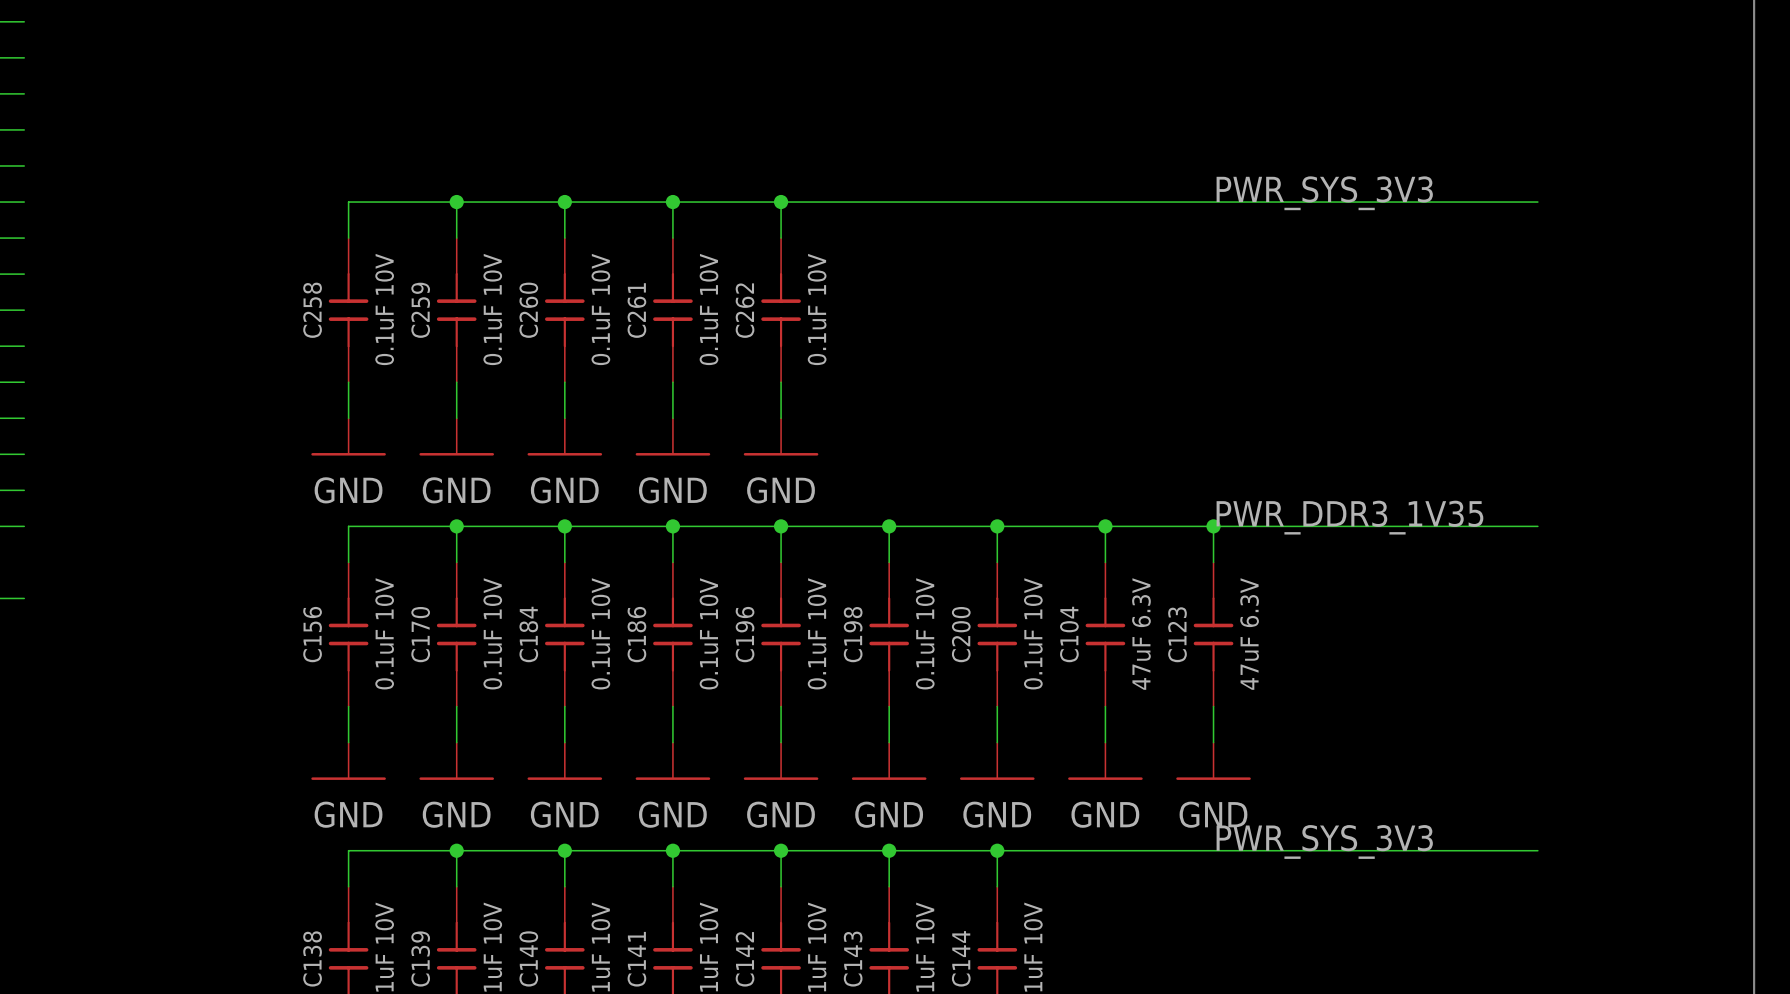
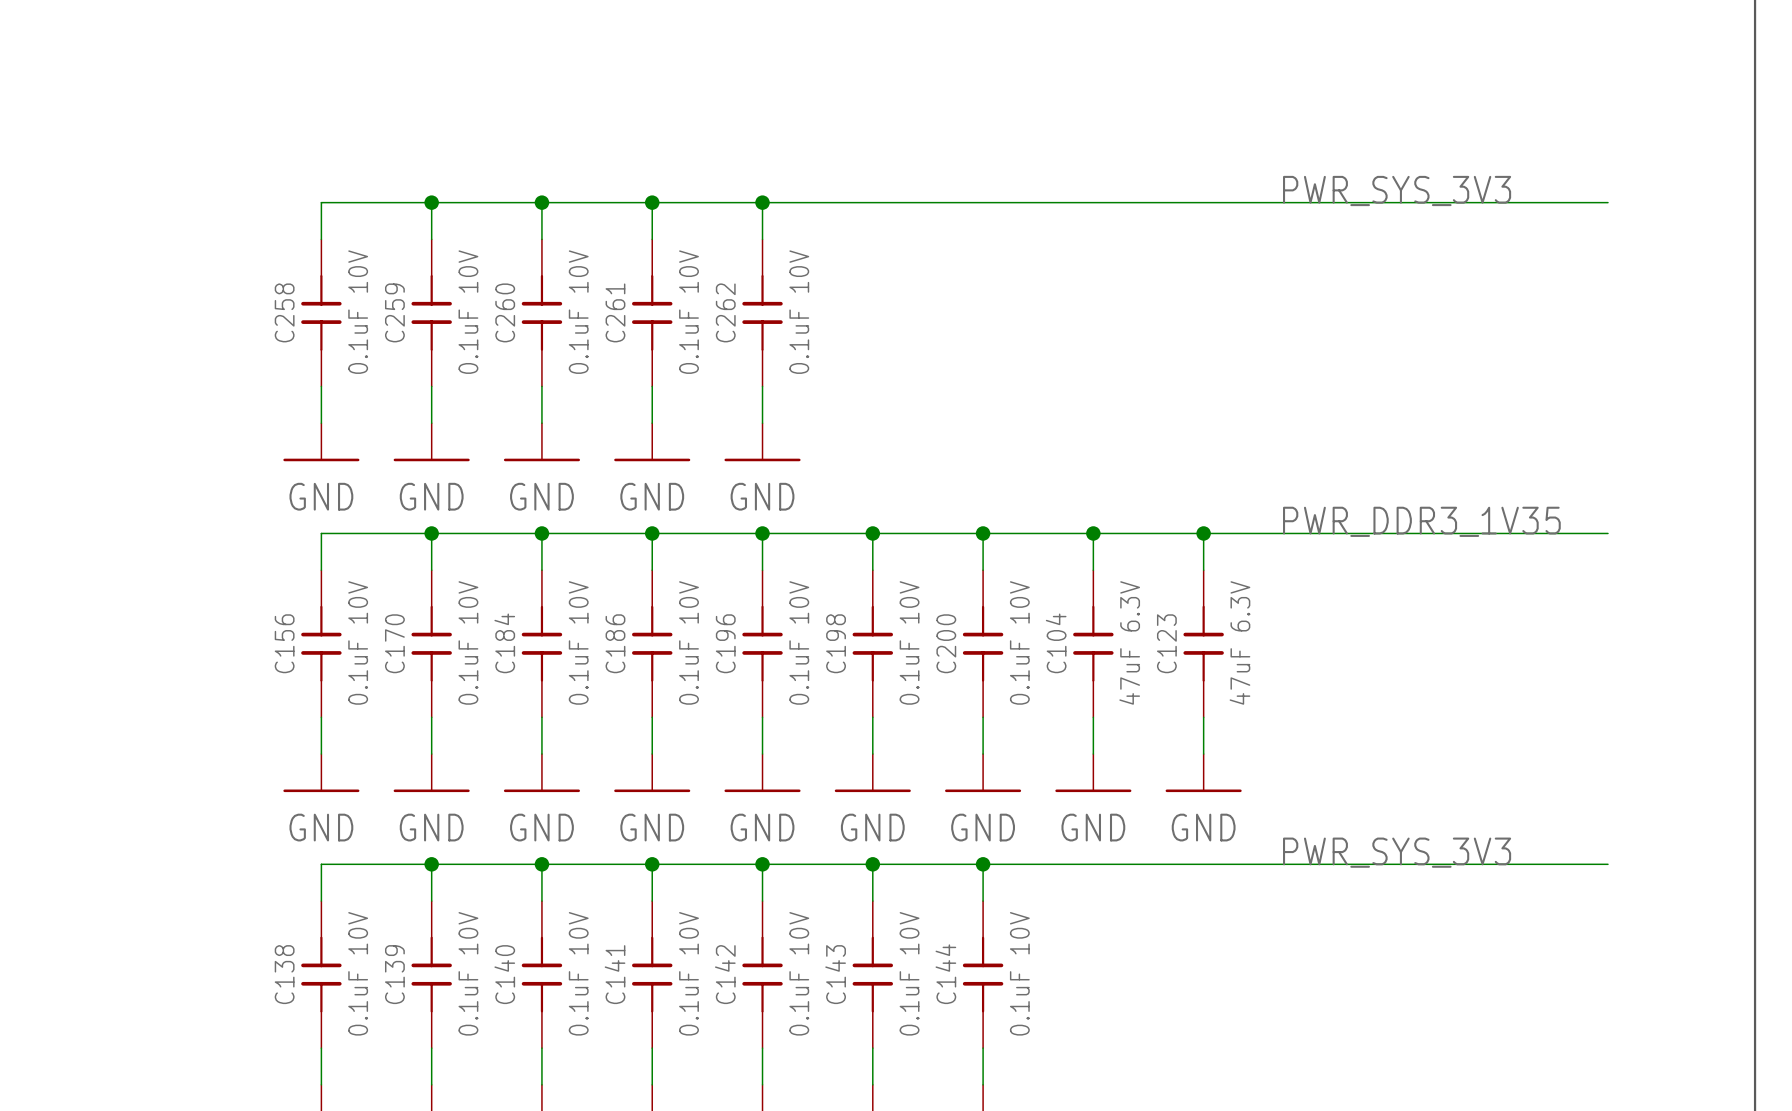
label position: PWR_SYS_3V3 (1324, 193) -> PWR_SYS_3V3 (1397, 190)
wire: none -> (1534, 202) (1608, 202)
label position: PWR_DDR3_1V35 (1349, 517) -> PWR_DDR3_1V35 (1421, 521)
wire: none -> (1534, 533) (1608, 533)
label position: PWR_SYS_3V3 (1324, 841) -> PWR_SYS_3V3 (1397, 852)
wire: none -> (1534, 864) (1608, 864)

